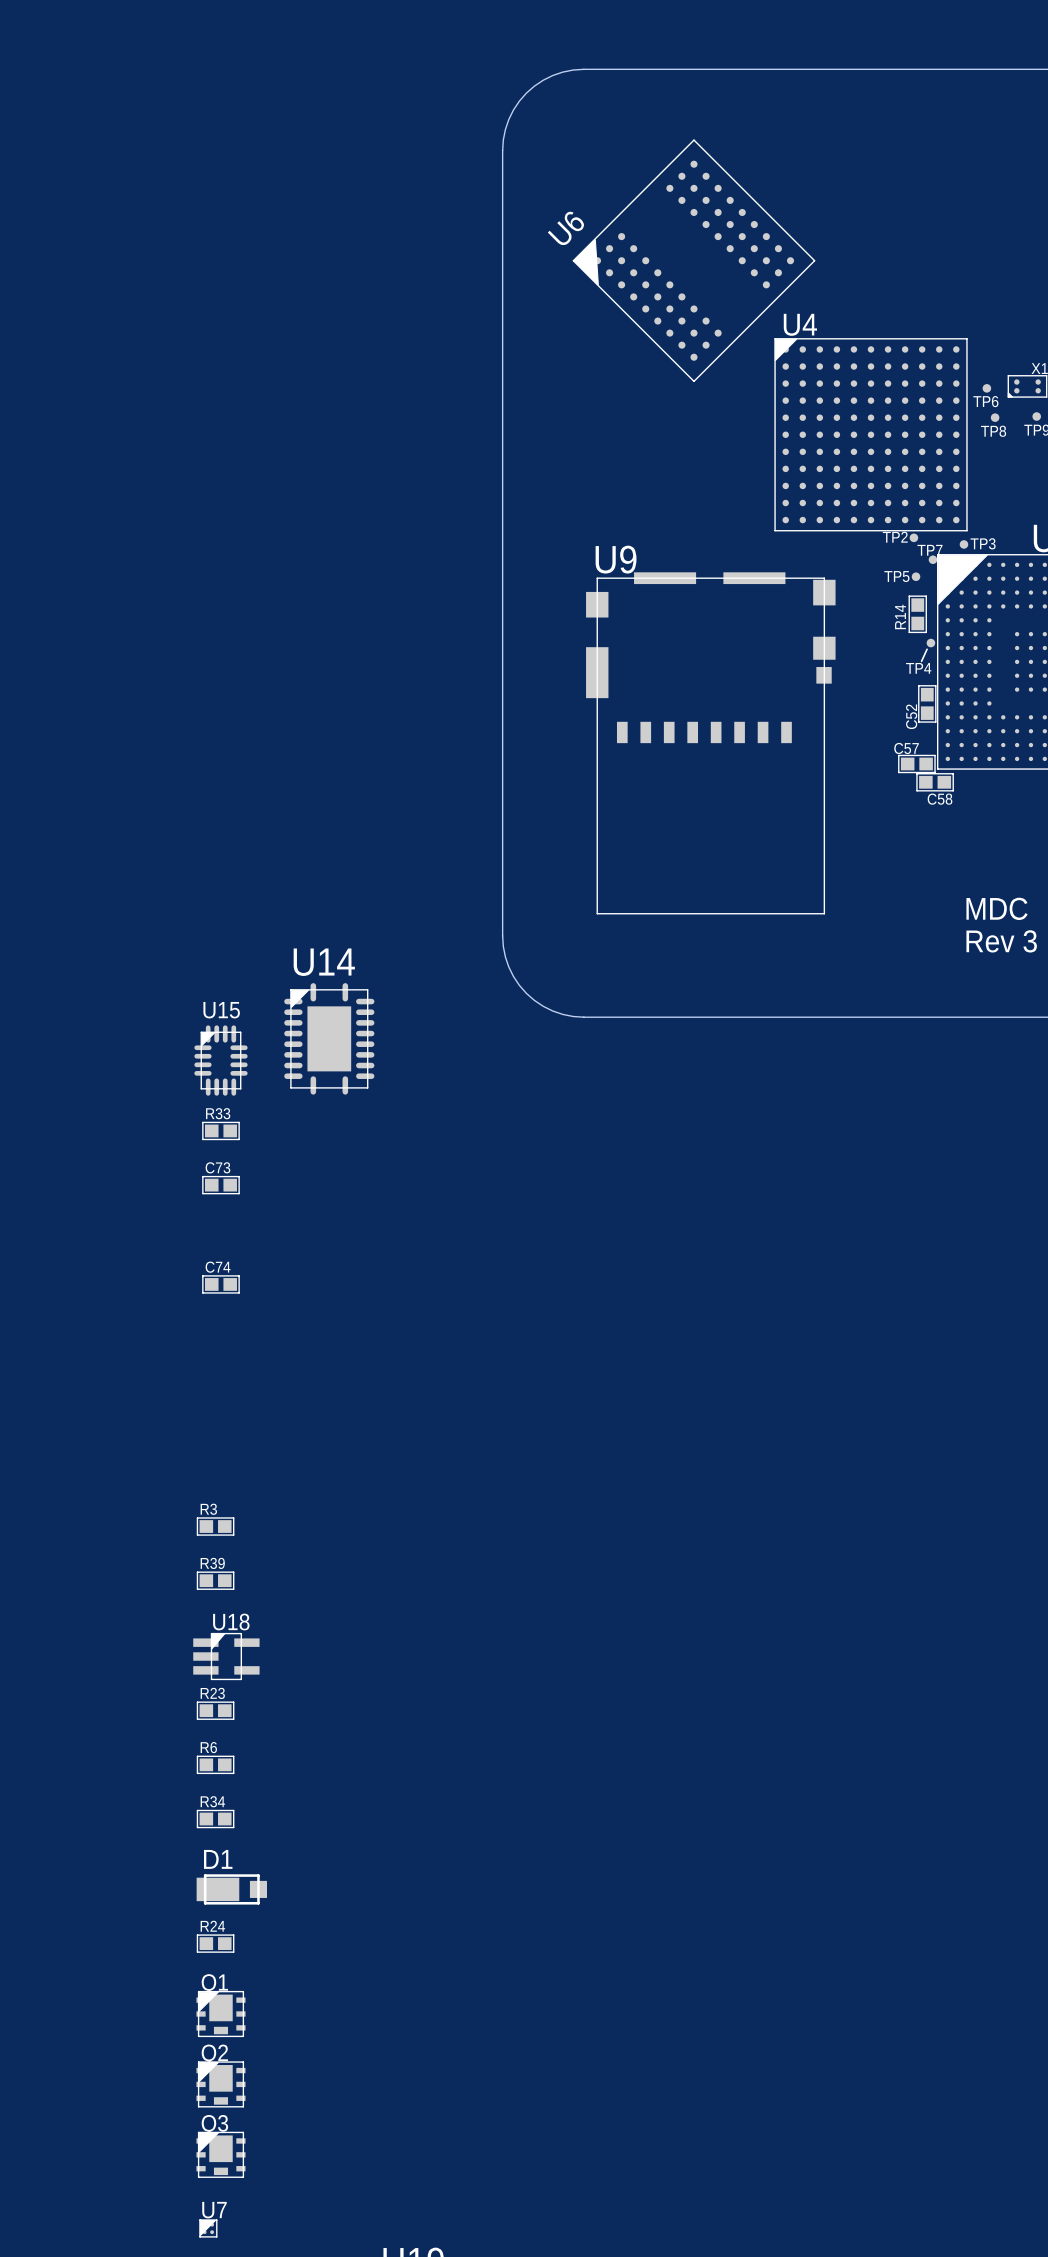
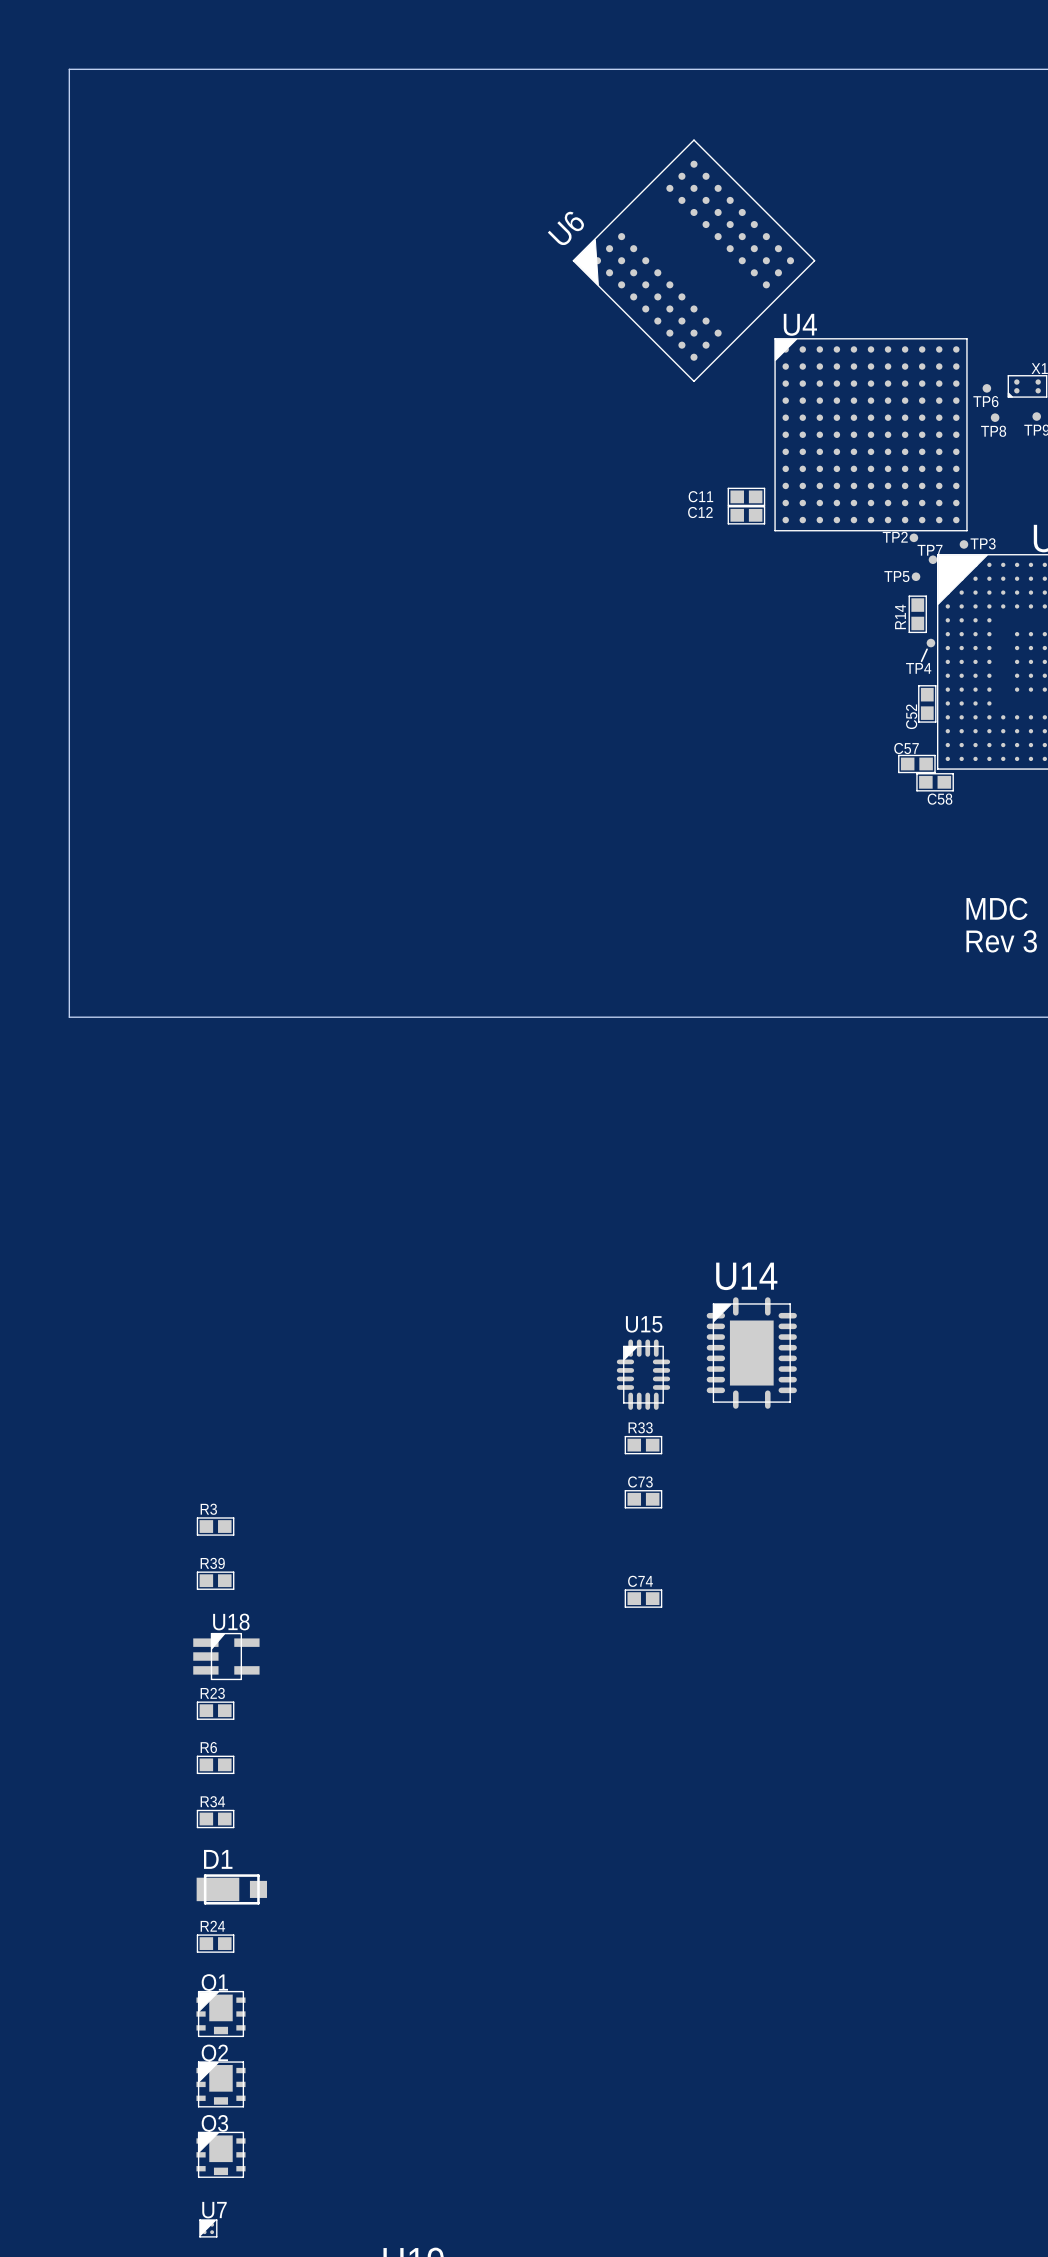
board edge: (583, 69) (552, 75) (526, 93) (508, 119) (502, 150) (503, 946) (513, 976) (526, 993) (552, 1011) (583, 1017) -> (583, 69) (69, 69) (69, 1017) (583, 1017)
C11: none -> (746, 496)
C12: none -> (746, 515)
U9: (710, 743) -> none
U14 position: (329, 1038) -> (751, 1353)
U15 position: (220, 1060) -> (643, 1374)
R33 position: (220, 1130) -> (643, 1445)
C73 position: (220, 1185) -> (643, 1499)
C74 position: (220, 1284) -> (643, 1598)

